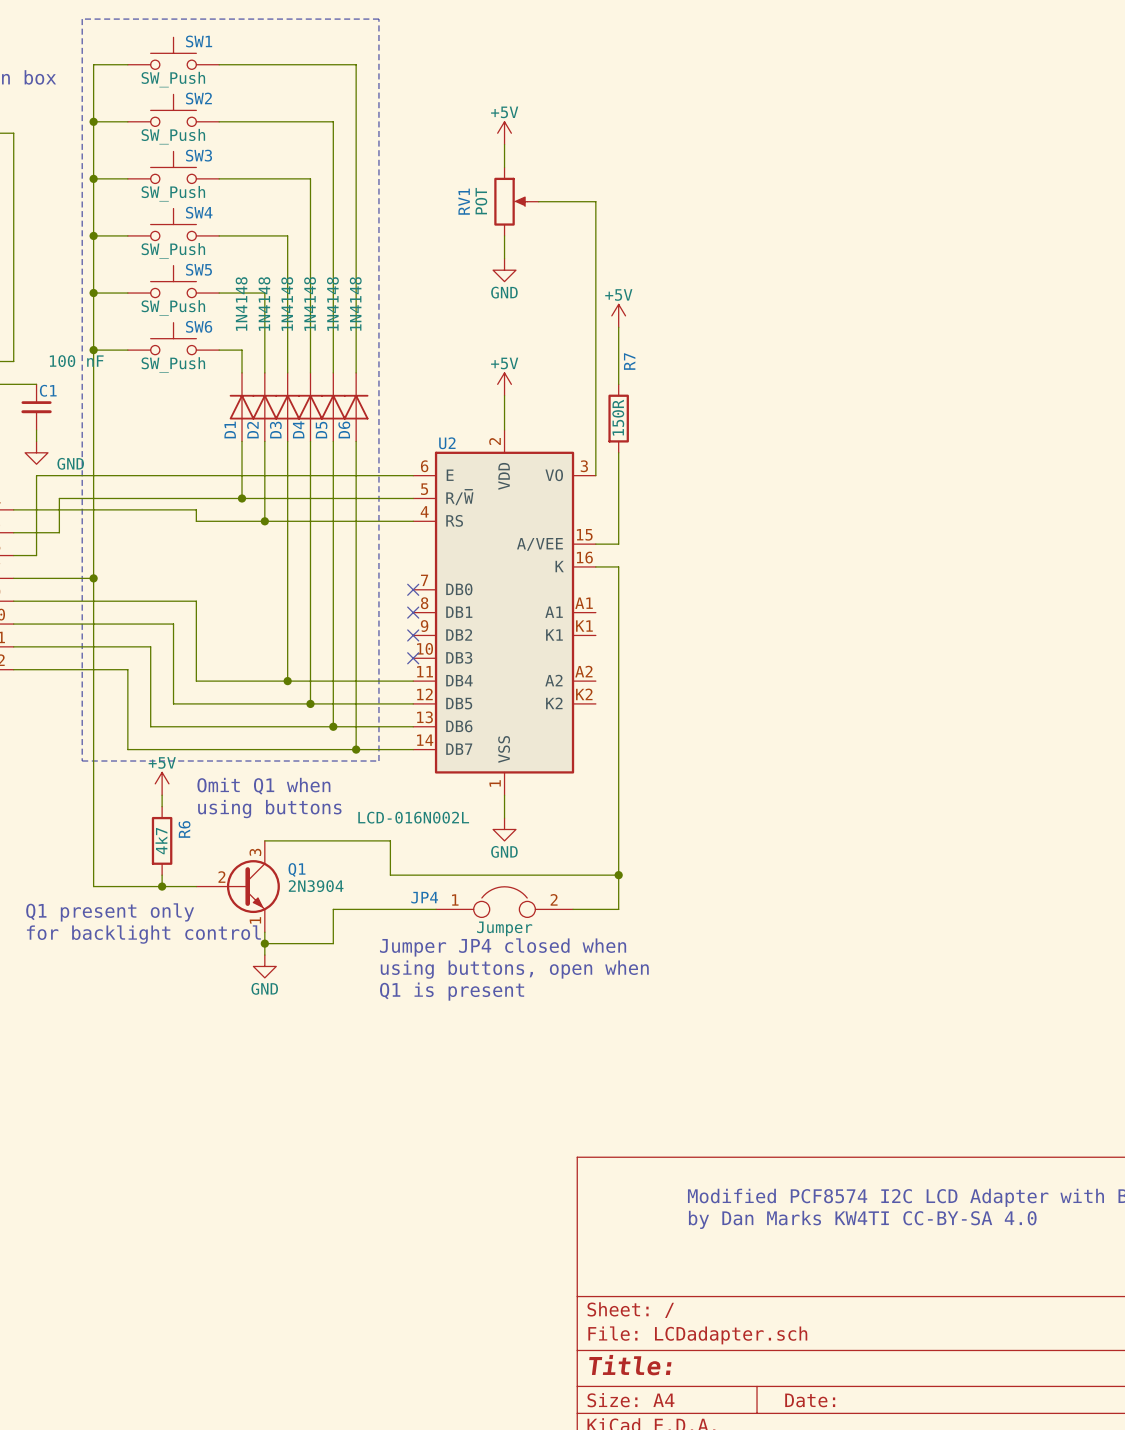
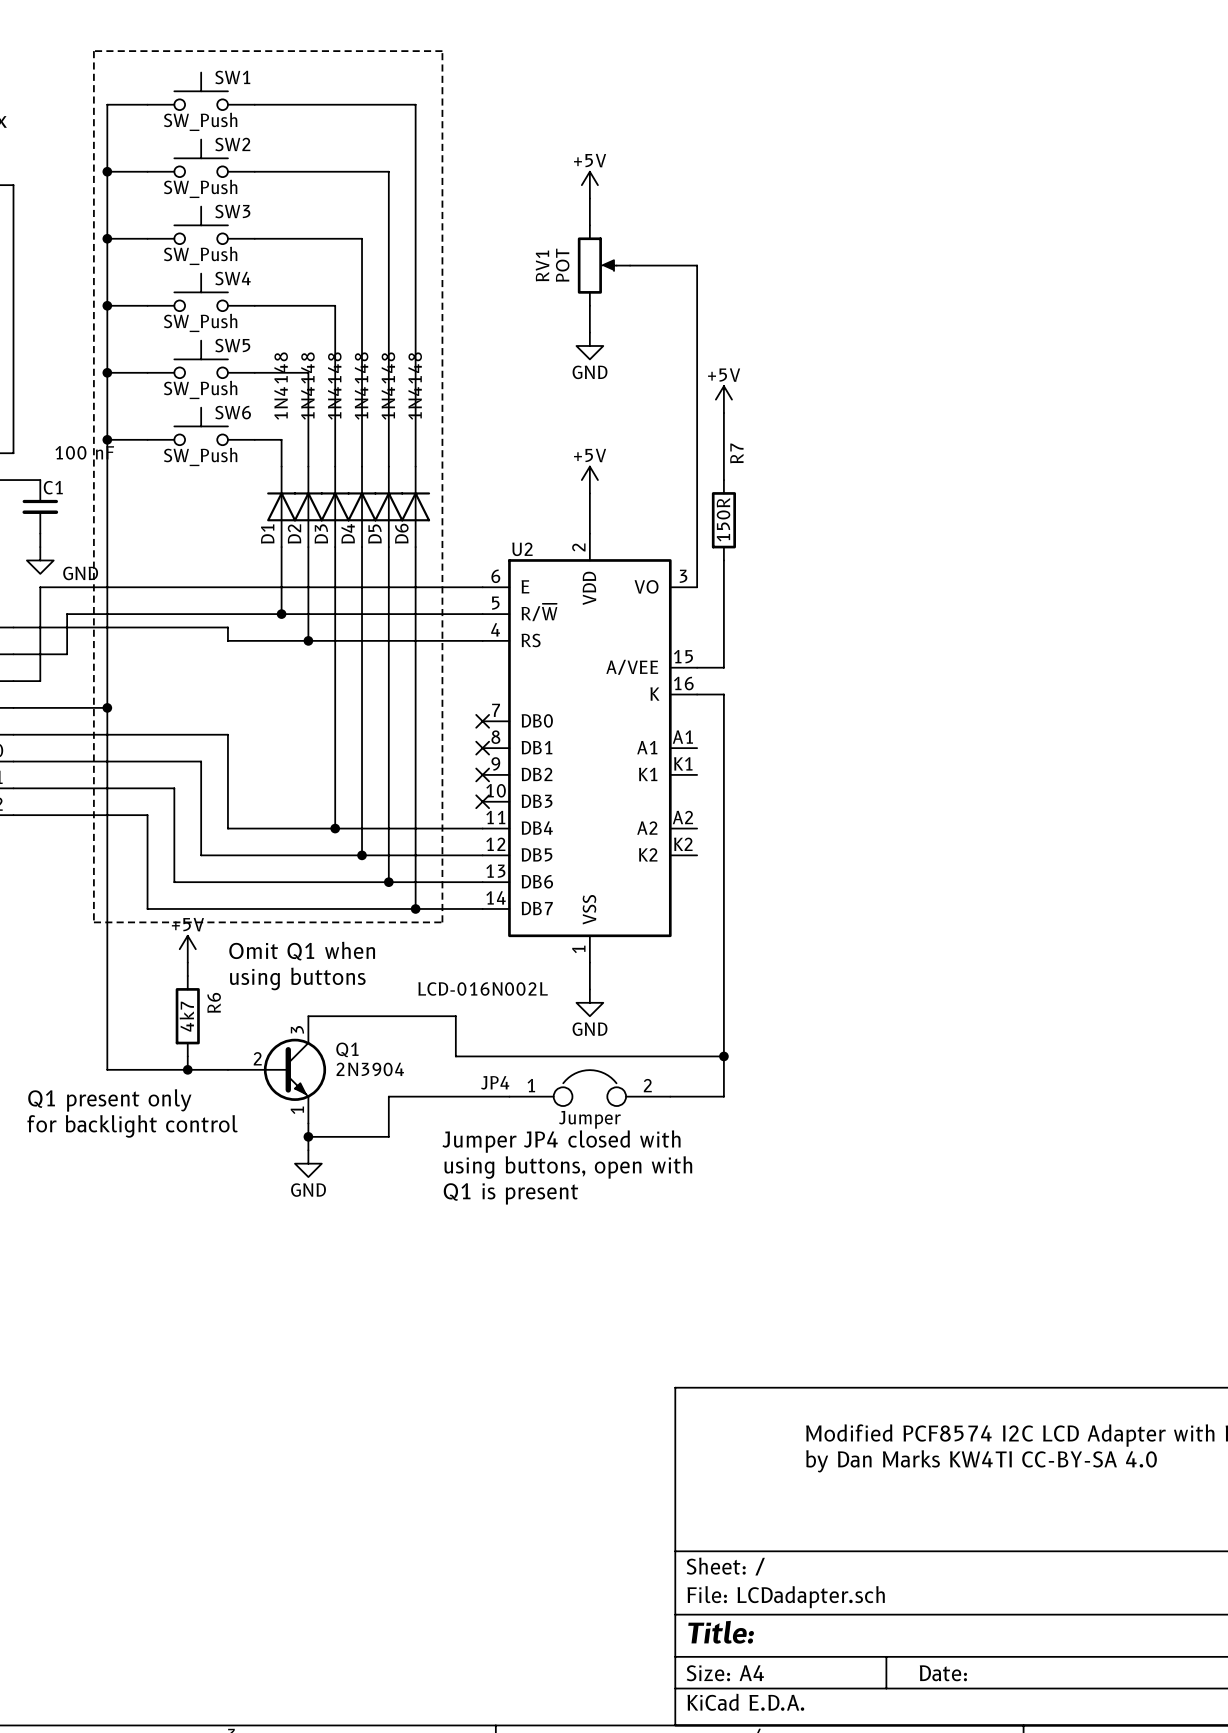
text: Jumper JP4 closed when (503, 947) -> Jumper JP4 closed with (561, 1141)
text: using buttons, open when (514, 969) -> using buttons, open with (568, 1167)

